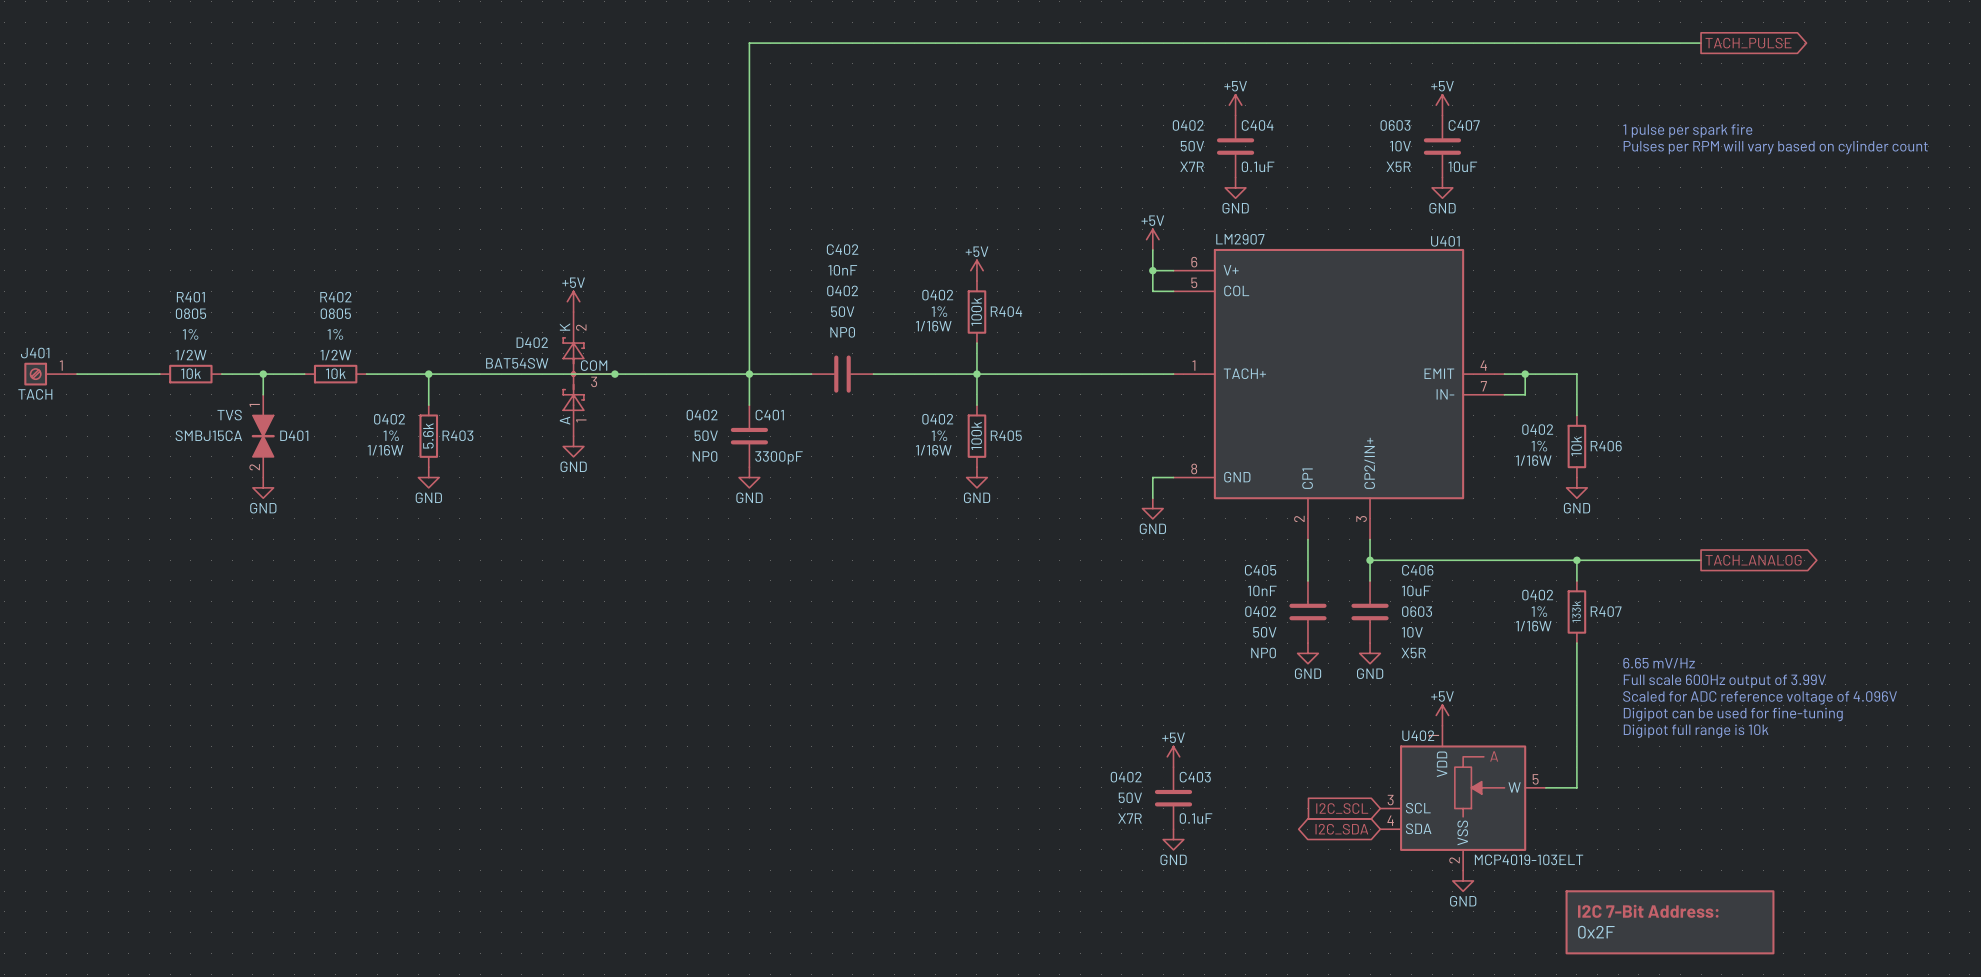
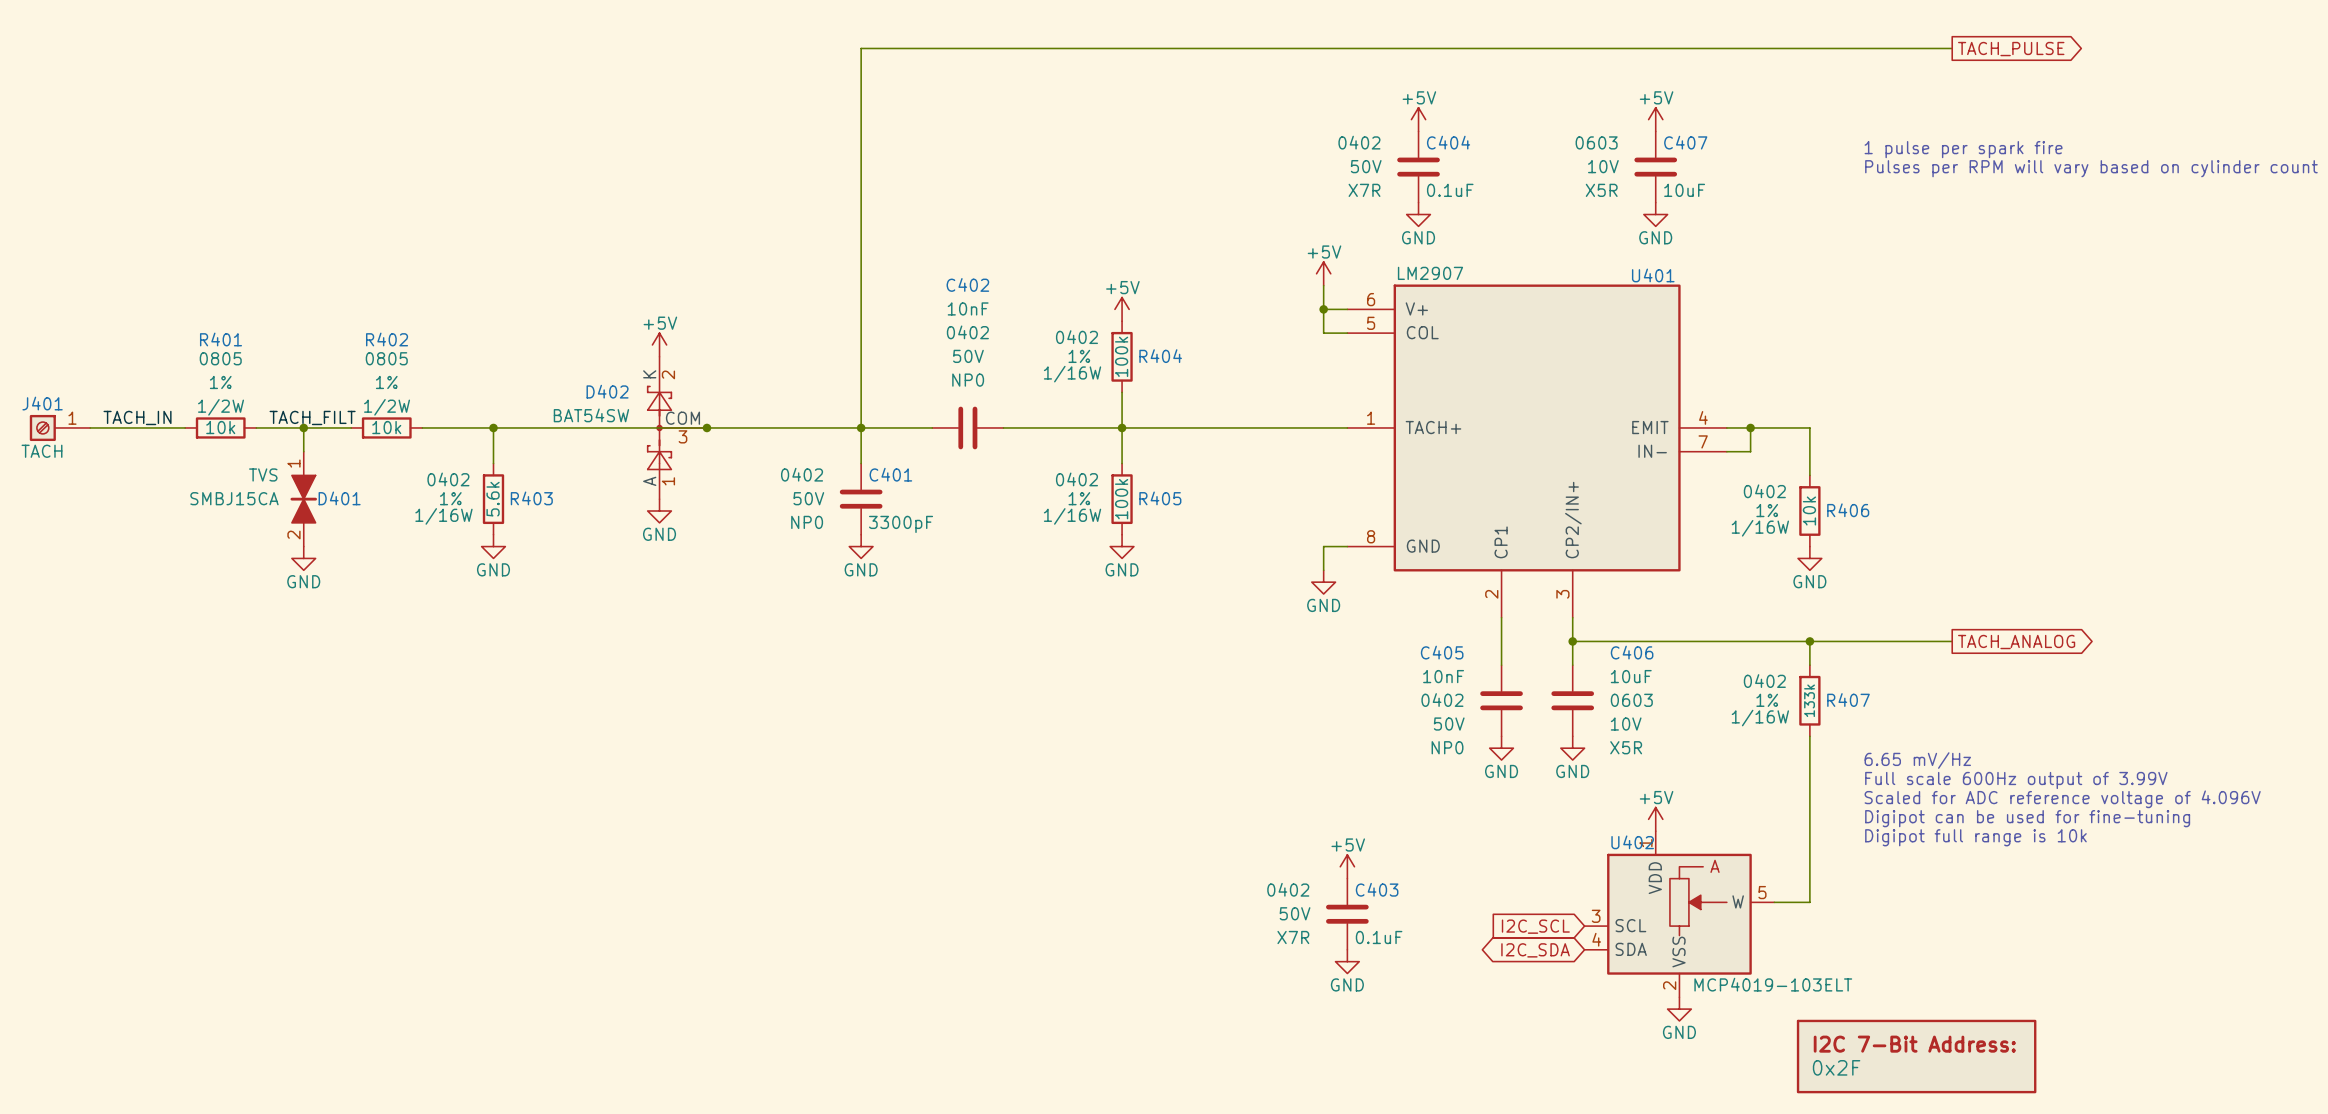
label: none -> TACH_IN (137, 417)
label: none -> TACH_FILT (312, 417)

